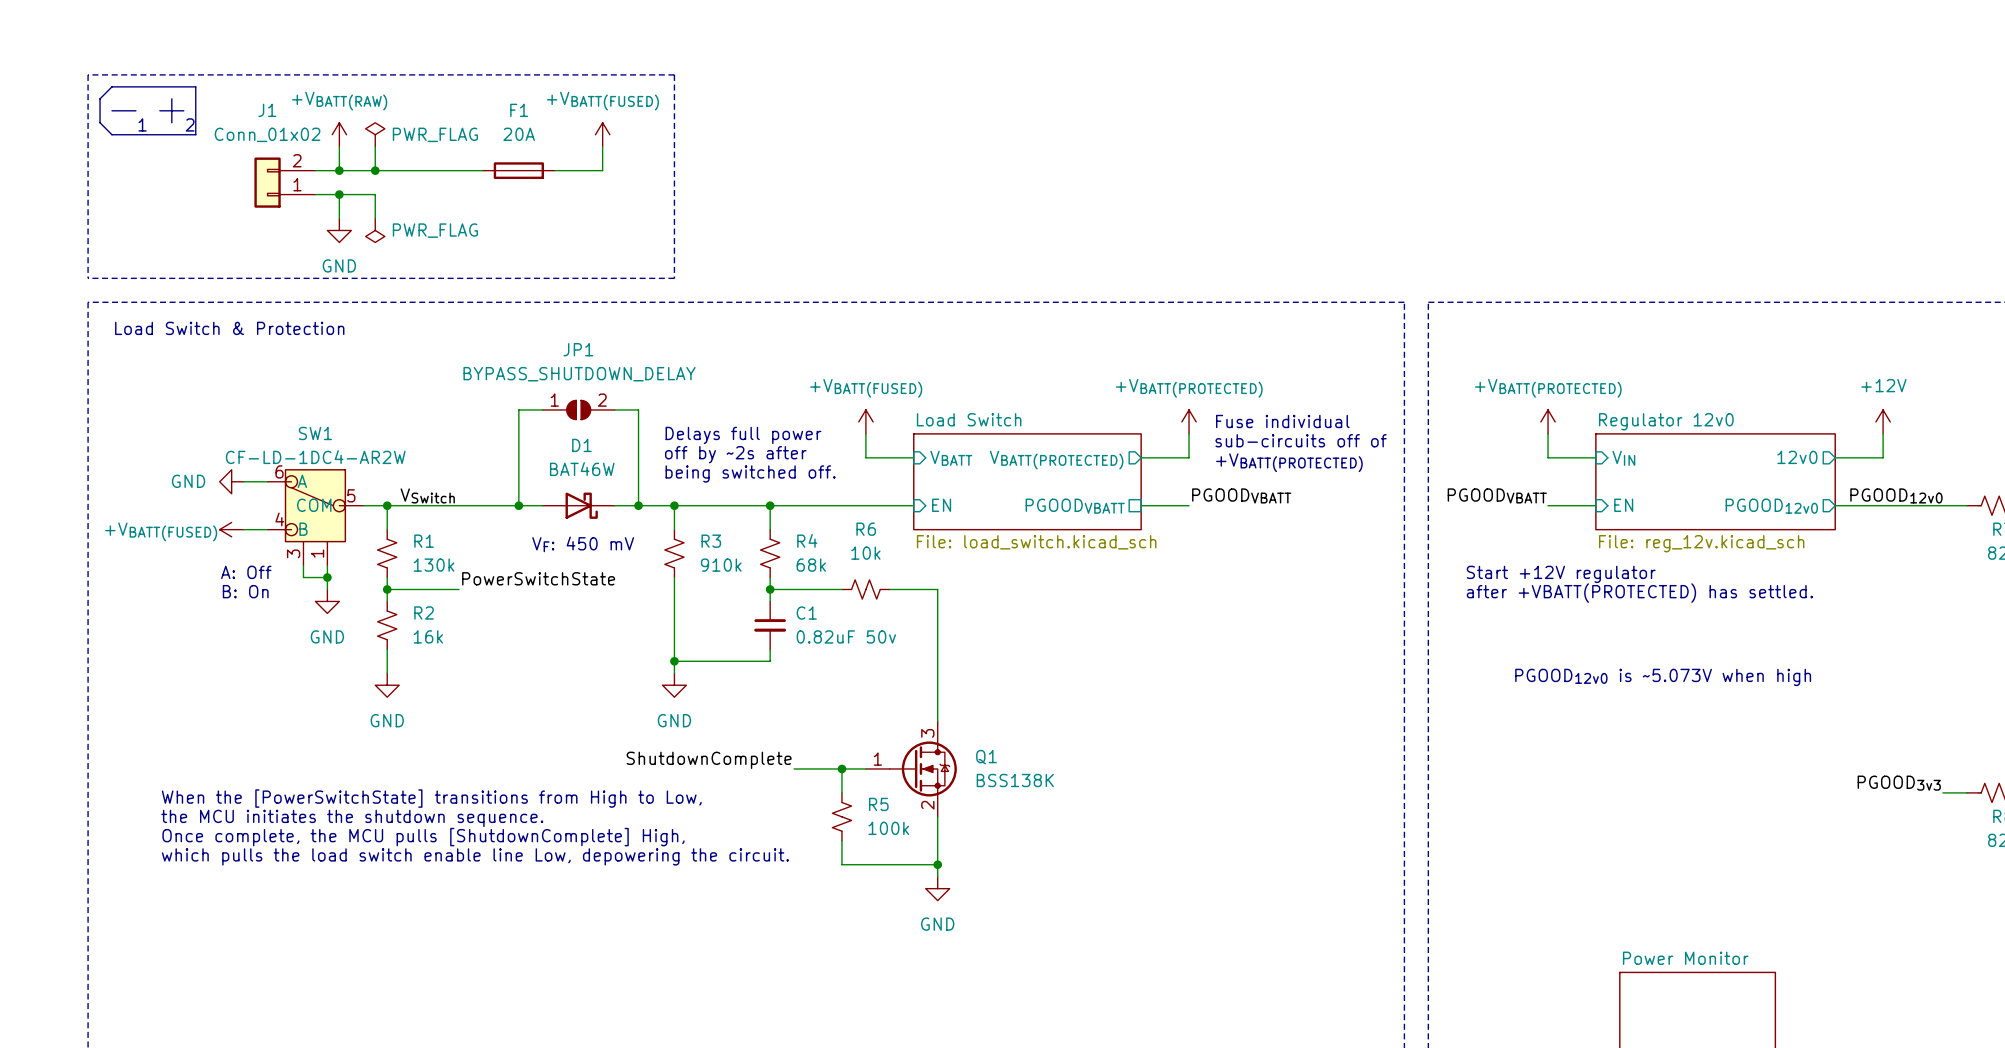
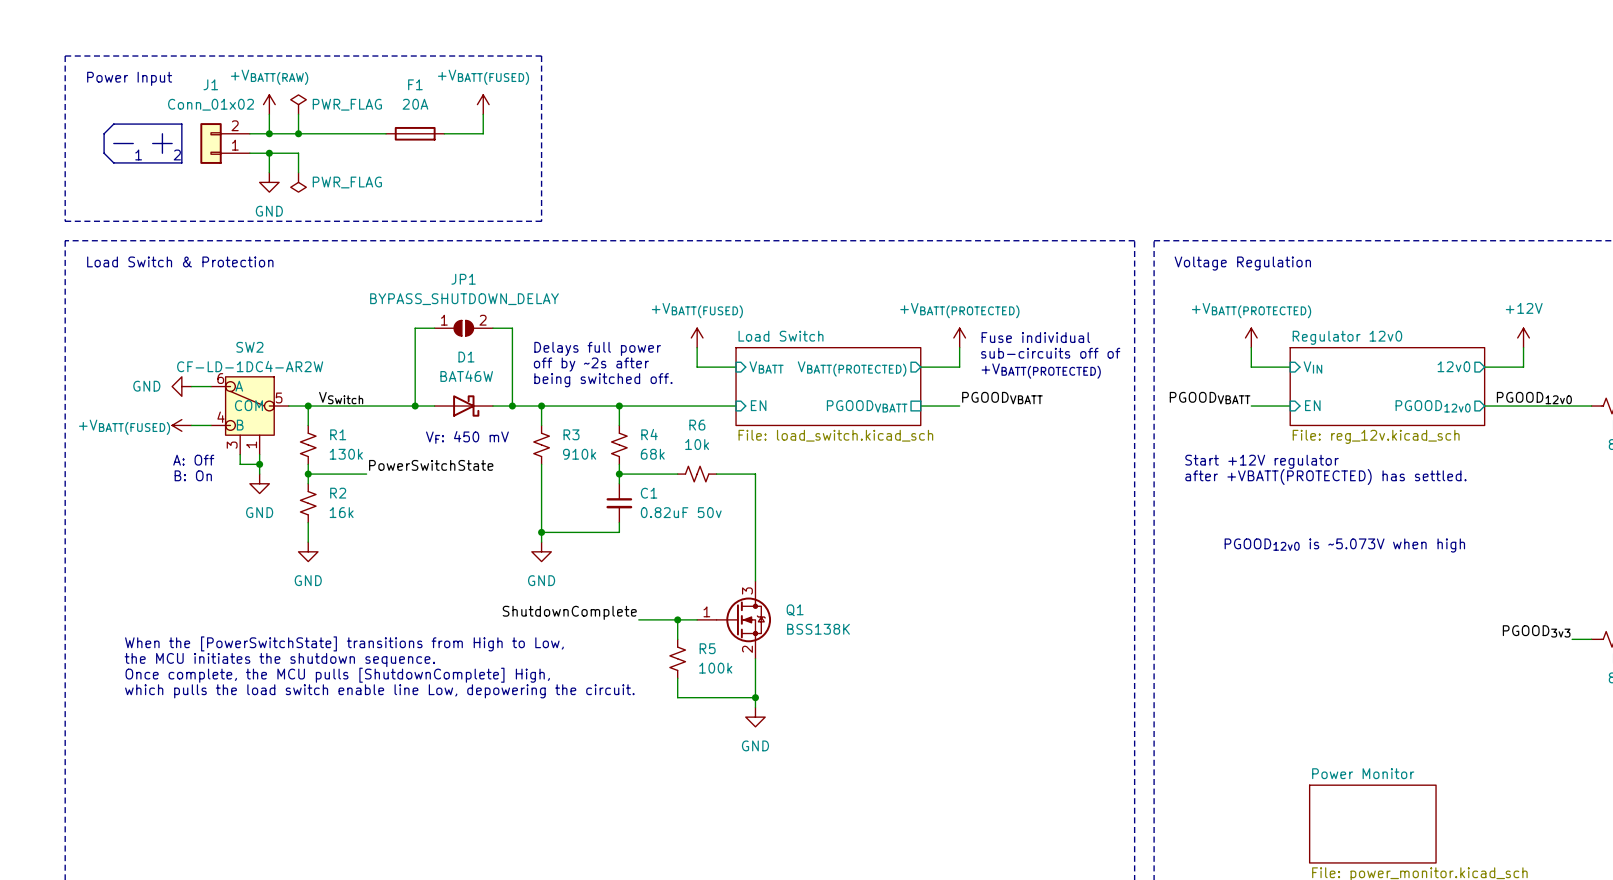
line: (111, 86) (195, 86) (195, 134) (111, 134) (100, 122) (100, 98) (111, 86) -> (113, 124) (181, 124) (181, 162) (113, 162) (104, 153) (104, 133) (113, 124)
line: (171, 98) (171, 122) -> (162, 133) (162, 153)
text: none -> Power Input (129, 78)
line: (111, 110) (135, 110) -> (152, 143) (172, 143)
line: (159, 110) (183, 110) -> (113, 143) (133, 143)
text position: 1 (142, 124) -> 1 (138, 154)
text position: 2 (190, 124) -> 2 (177, 154)
text: none -> Voltage Regulation (1242, 263)
SW1 name: SW1 (315, 433) -> SW2 (249, 347)

